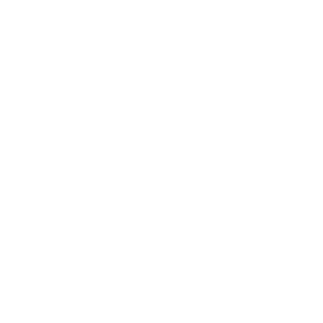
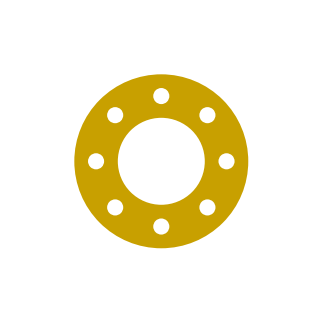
part: none -> (161, 161)

